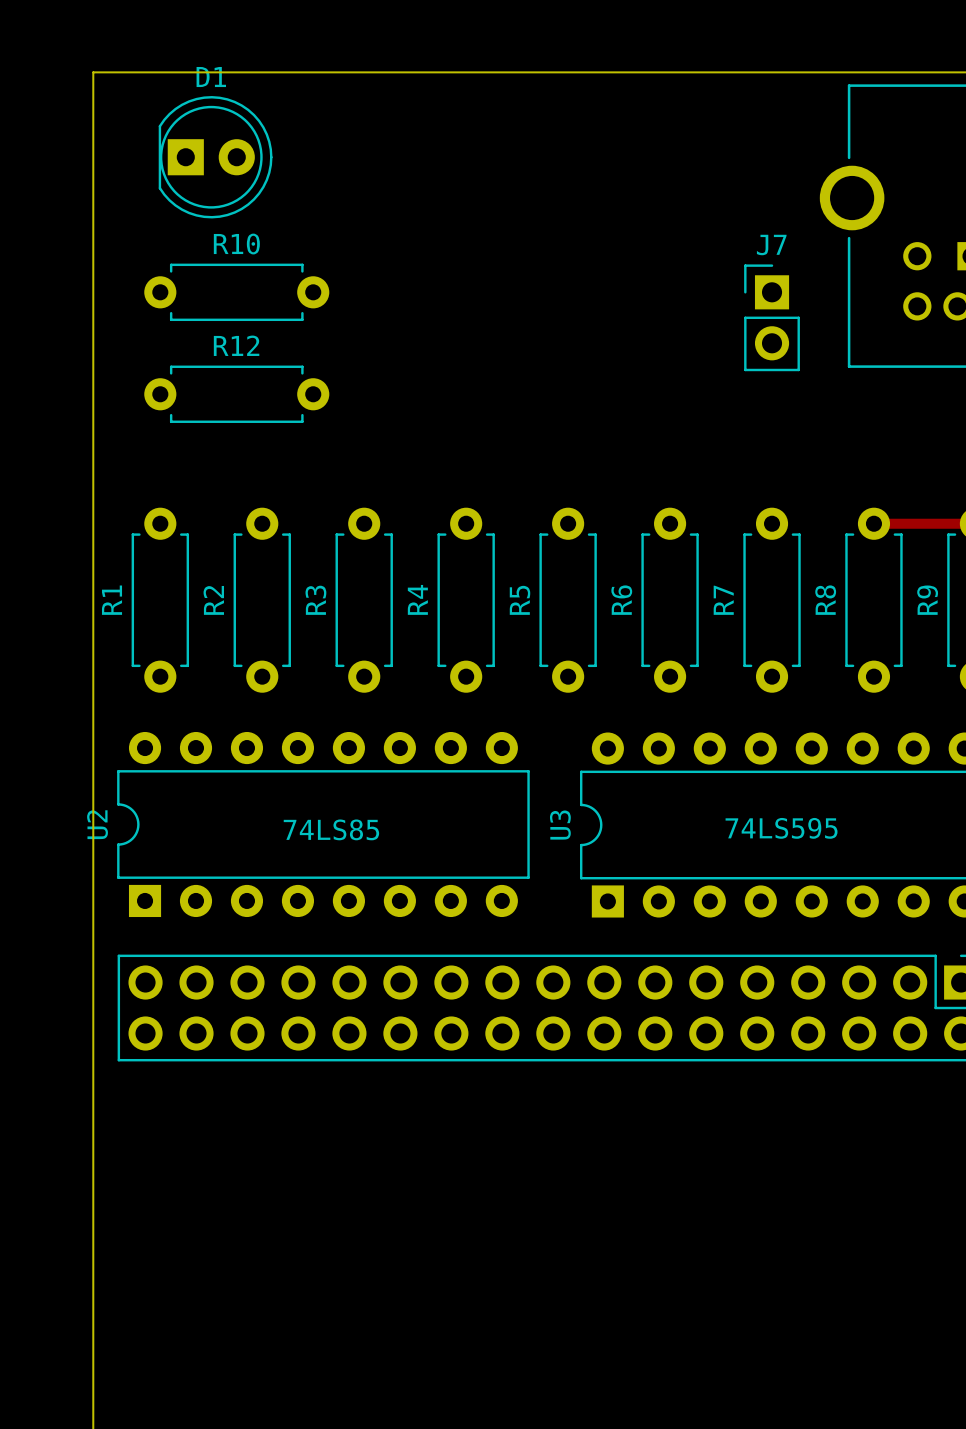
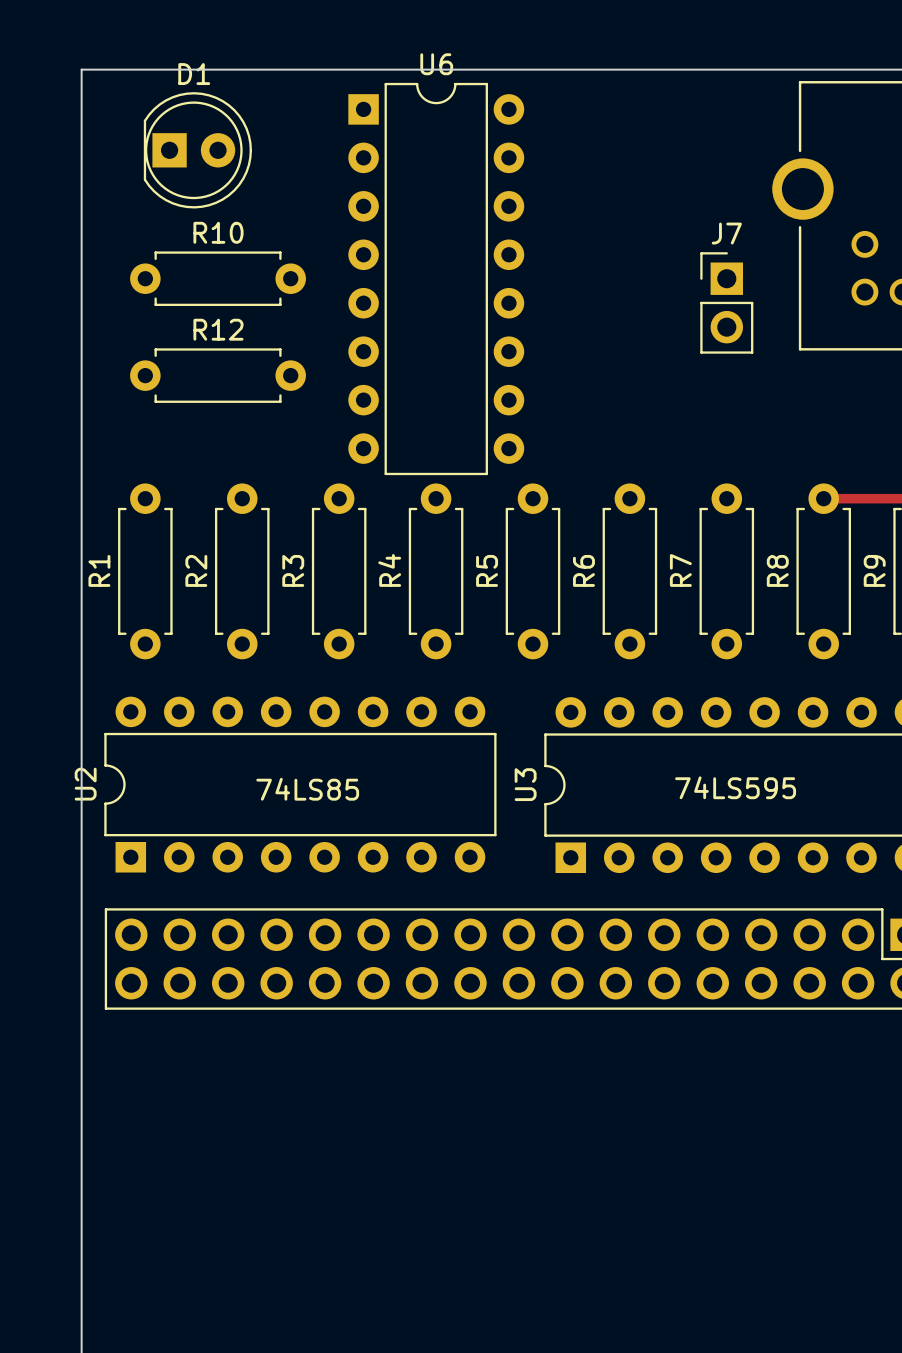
U6: none -> (436, 279)

